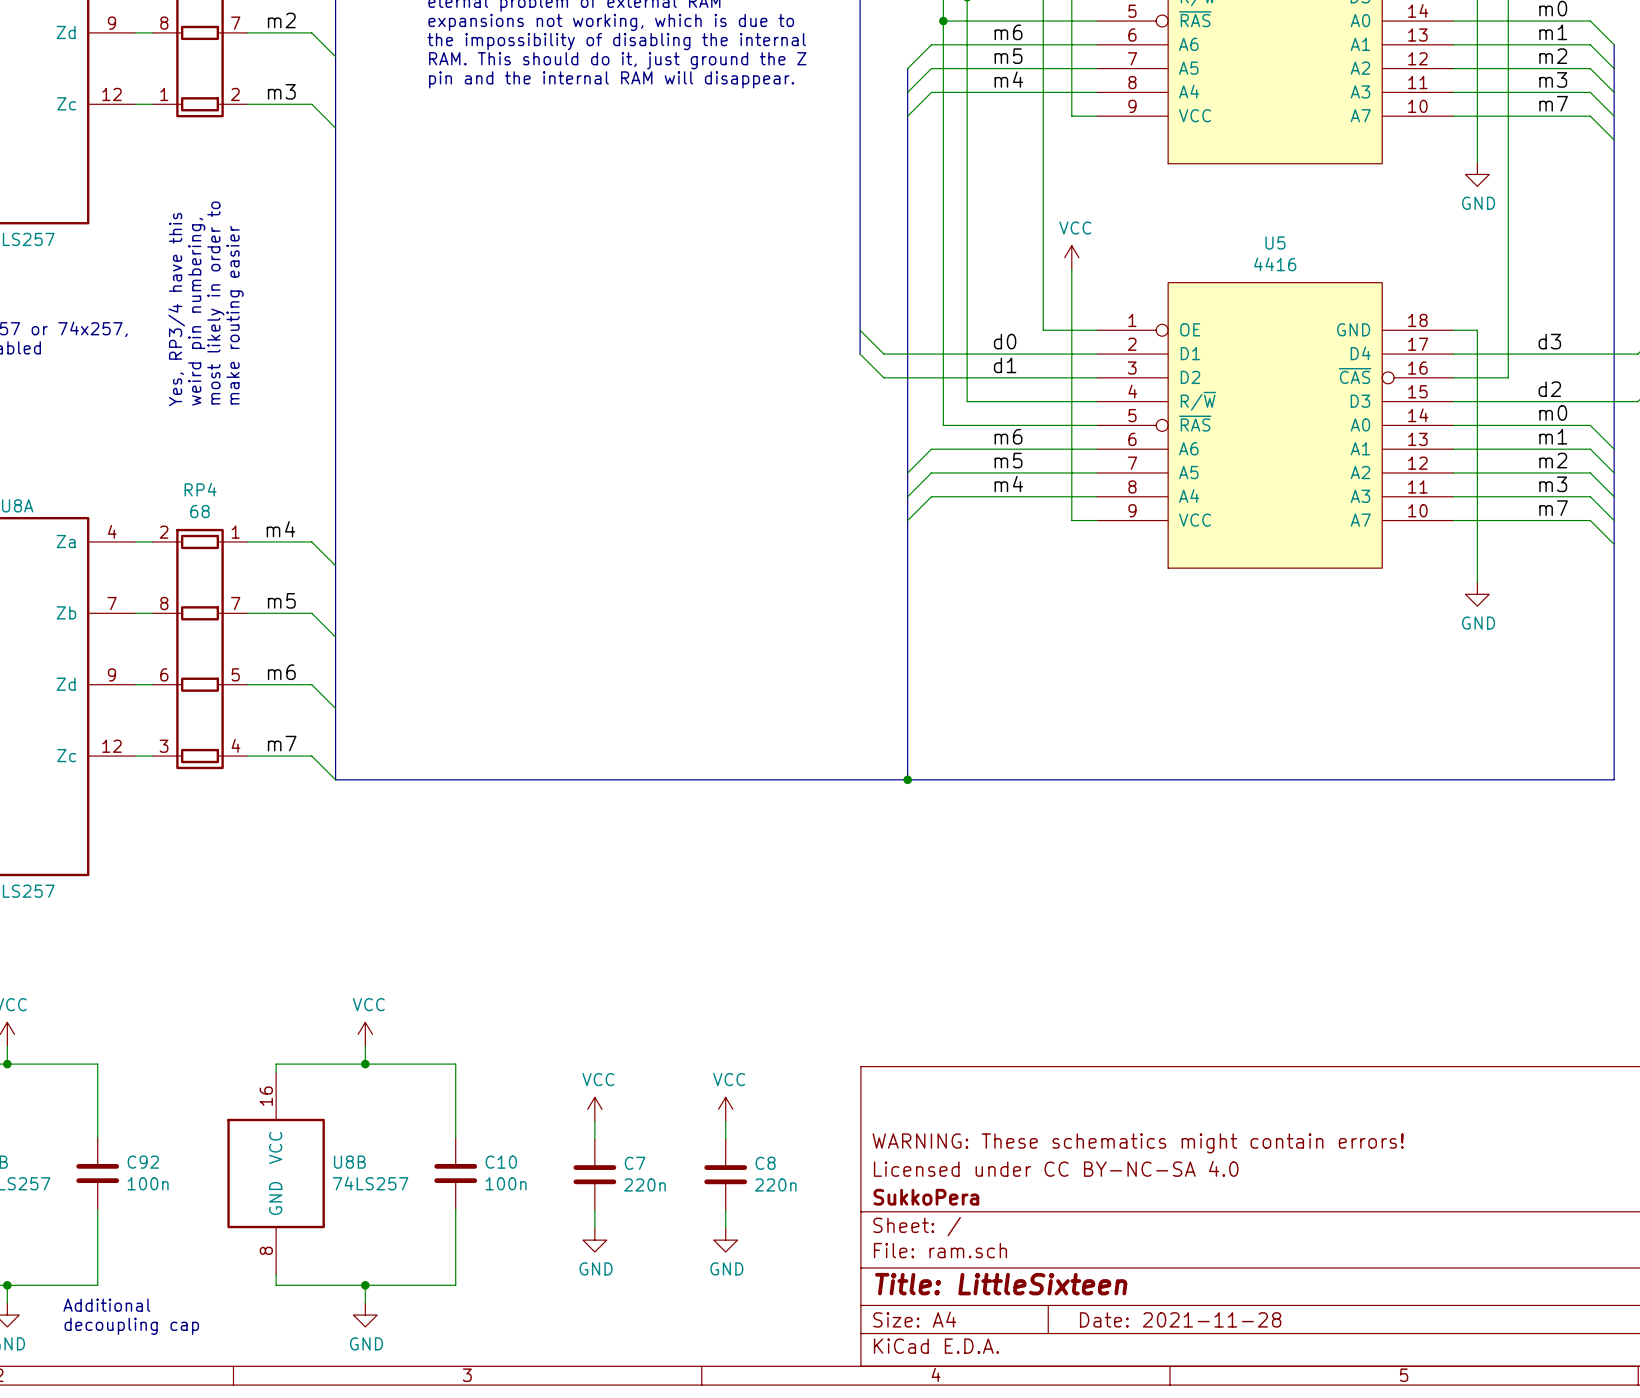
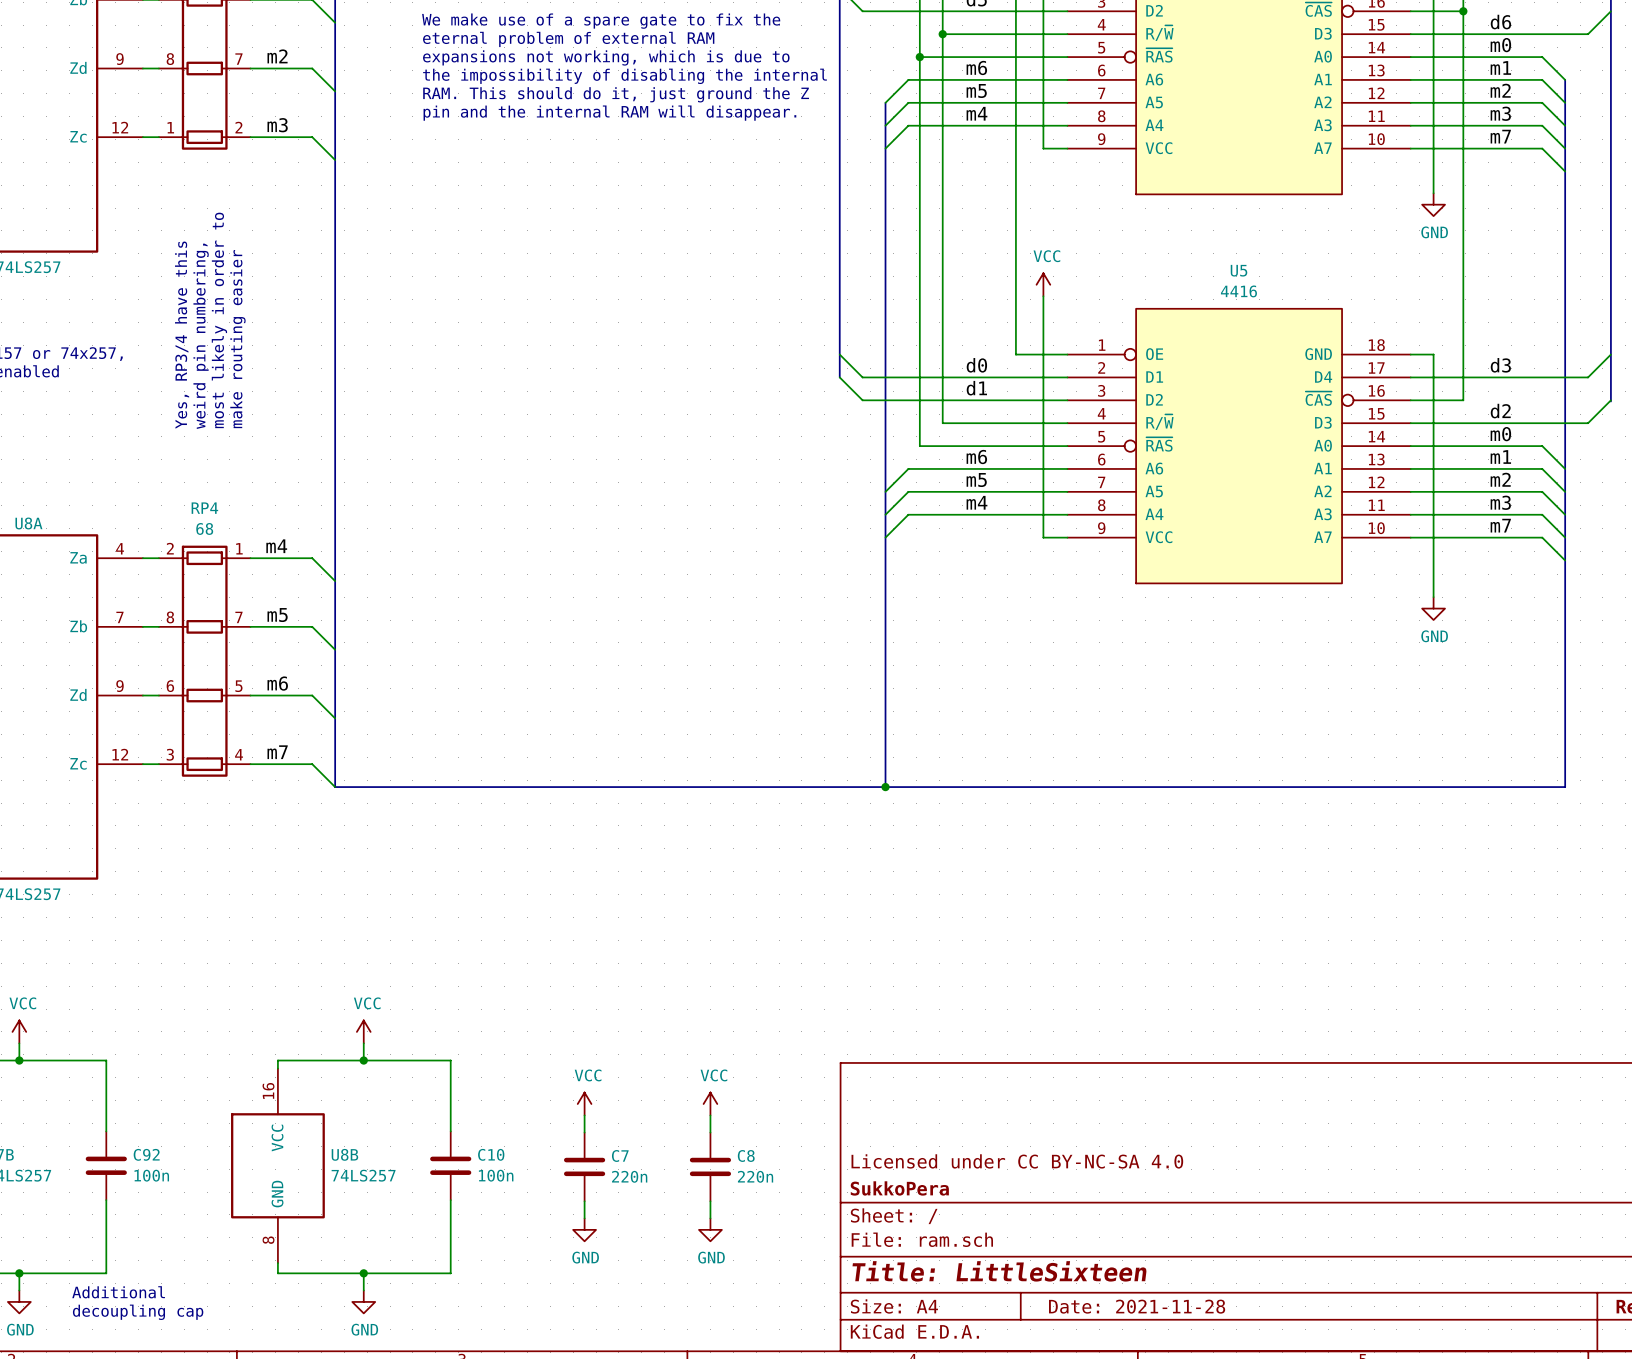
title block: WARNING: These schematics might contain errors! (1138, 1143) -> none

